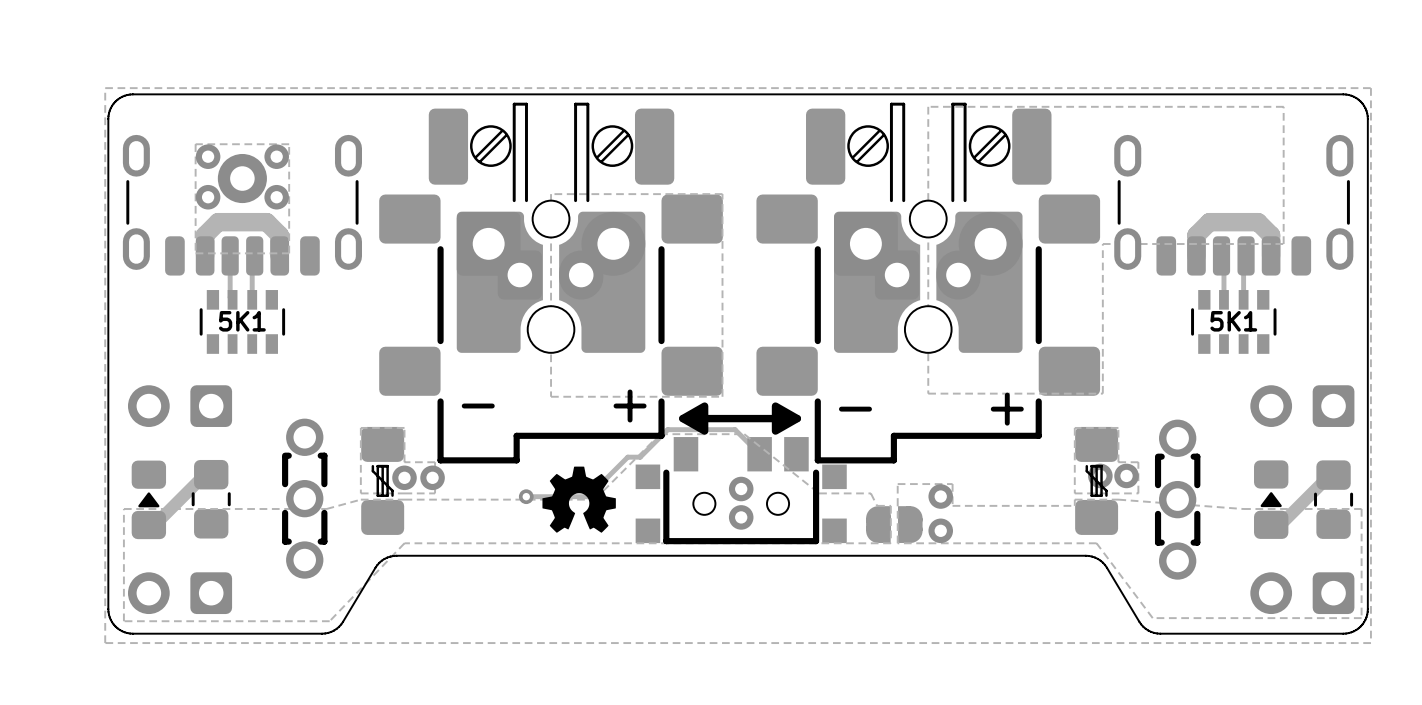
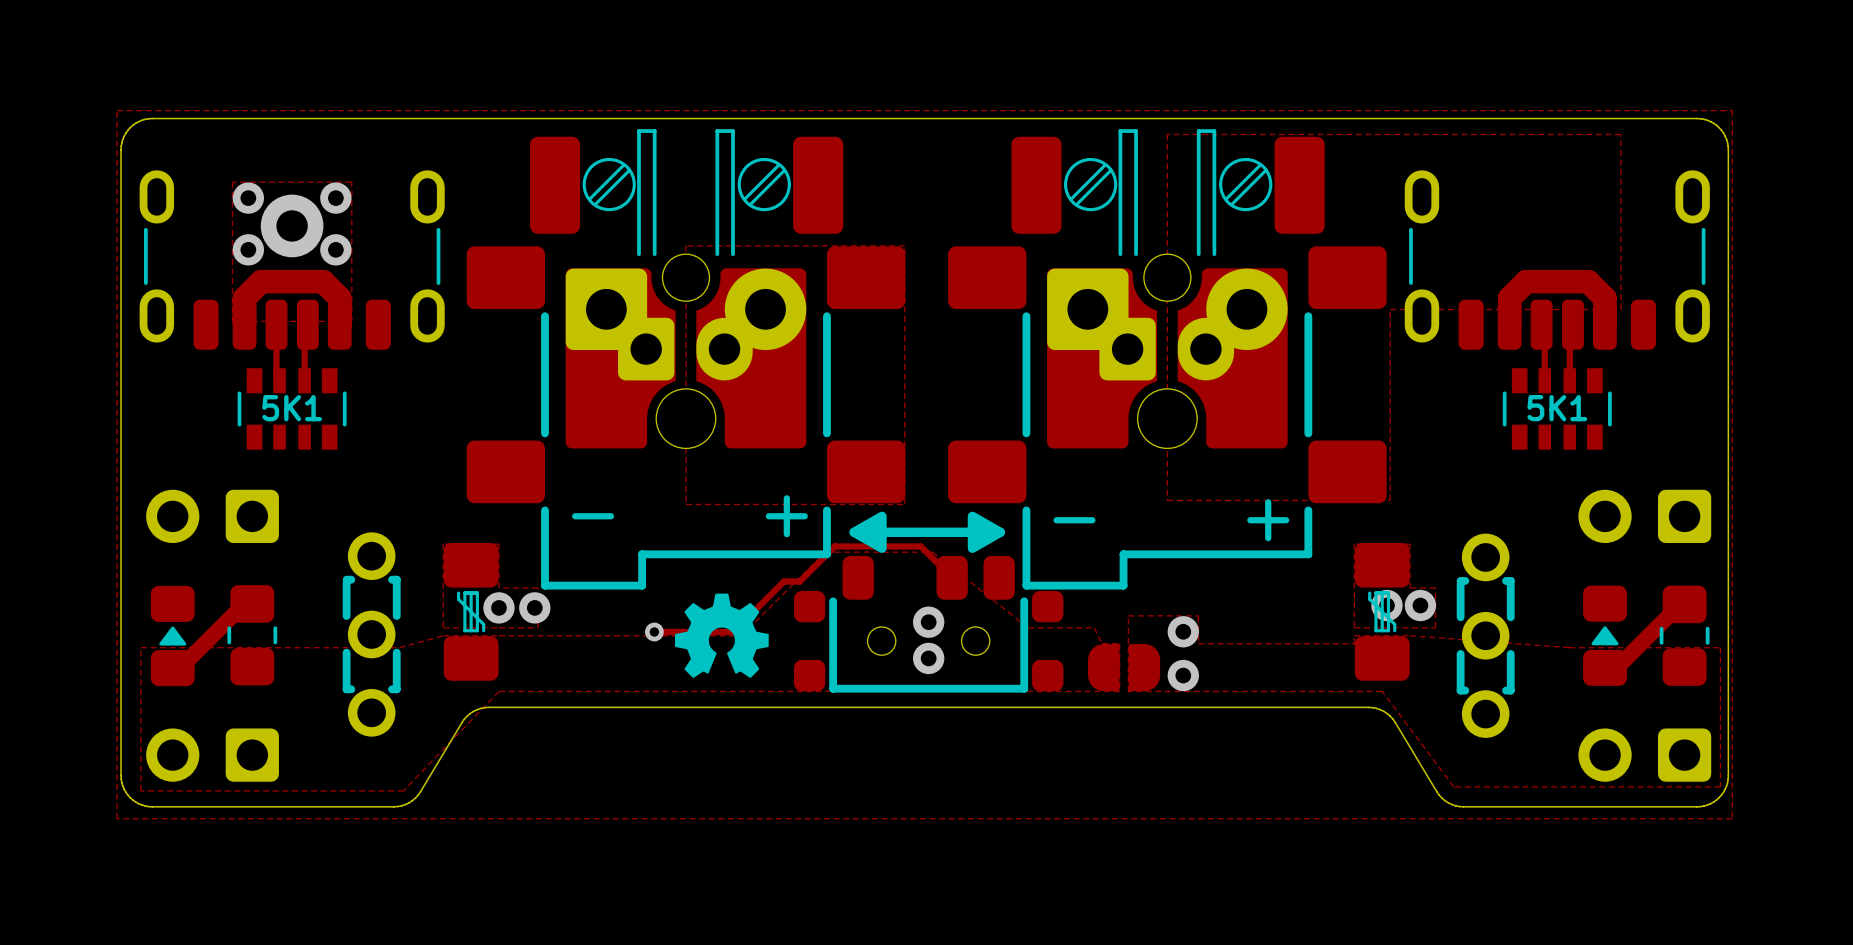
part footprint: [635, 437, 847, 545] -> [793, 555, 1064, 693]

